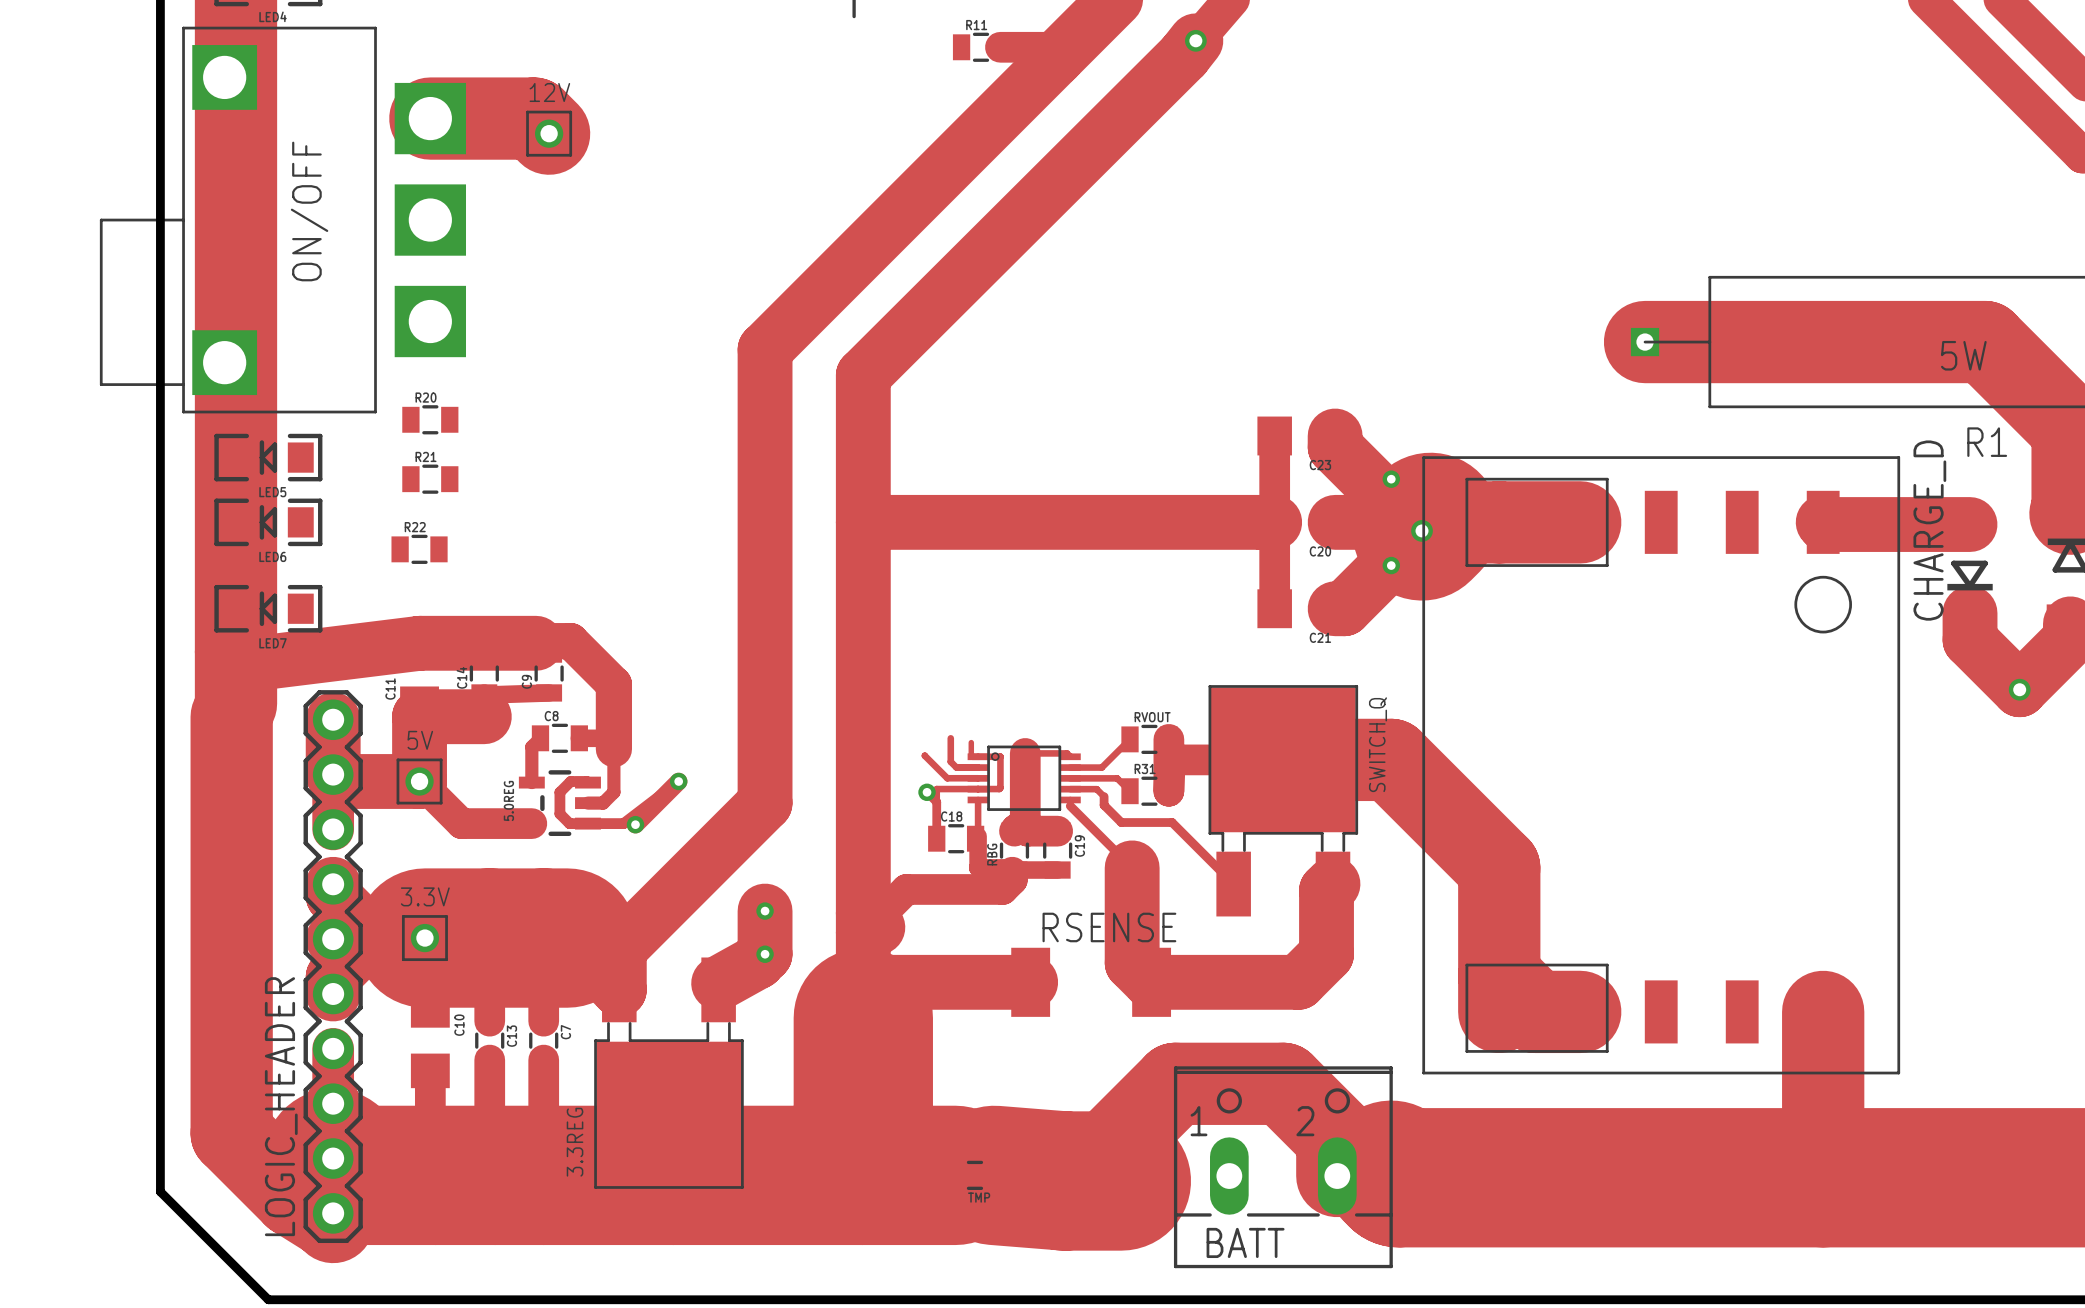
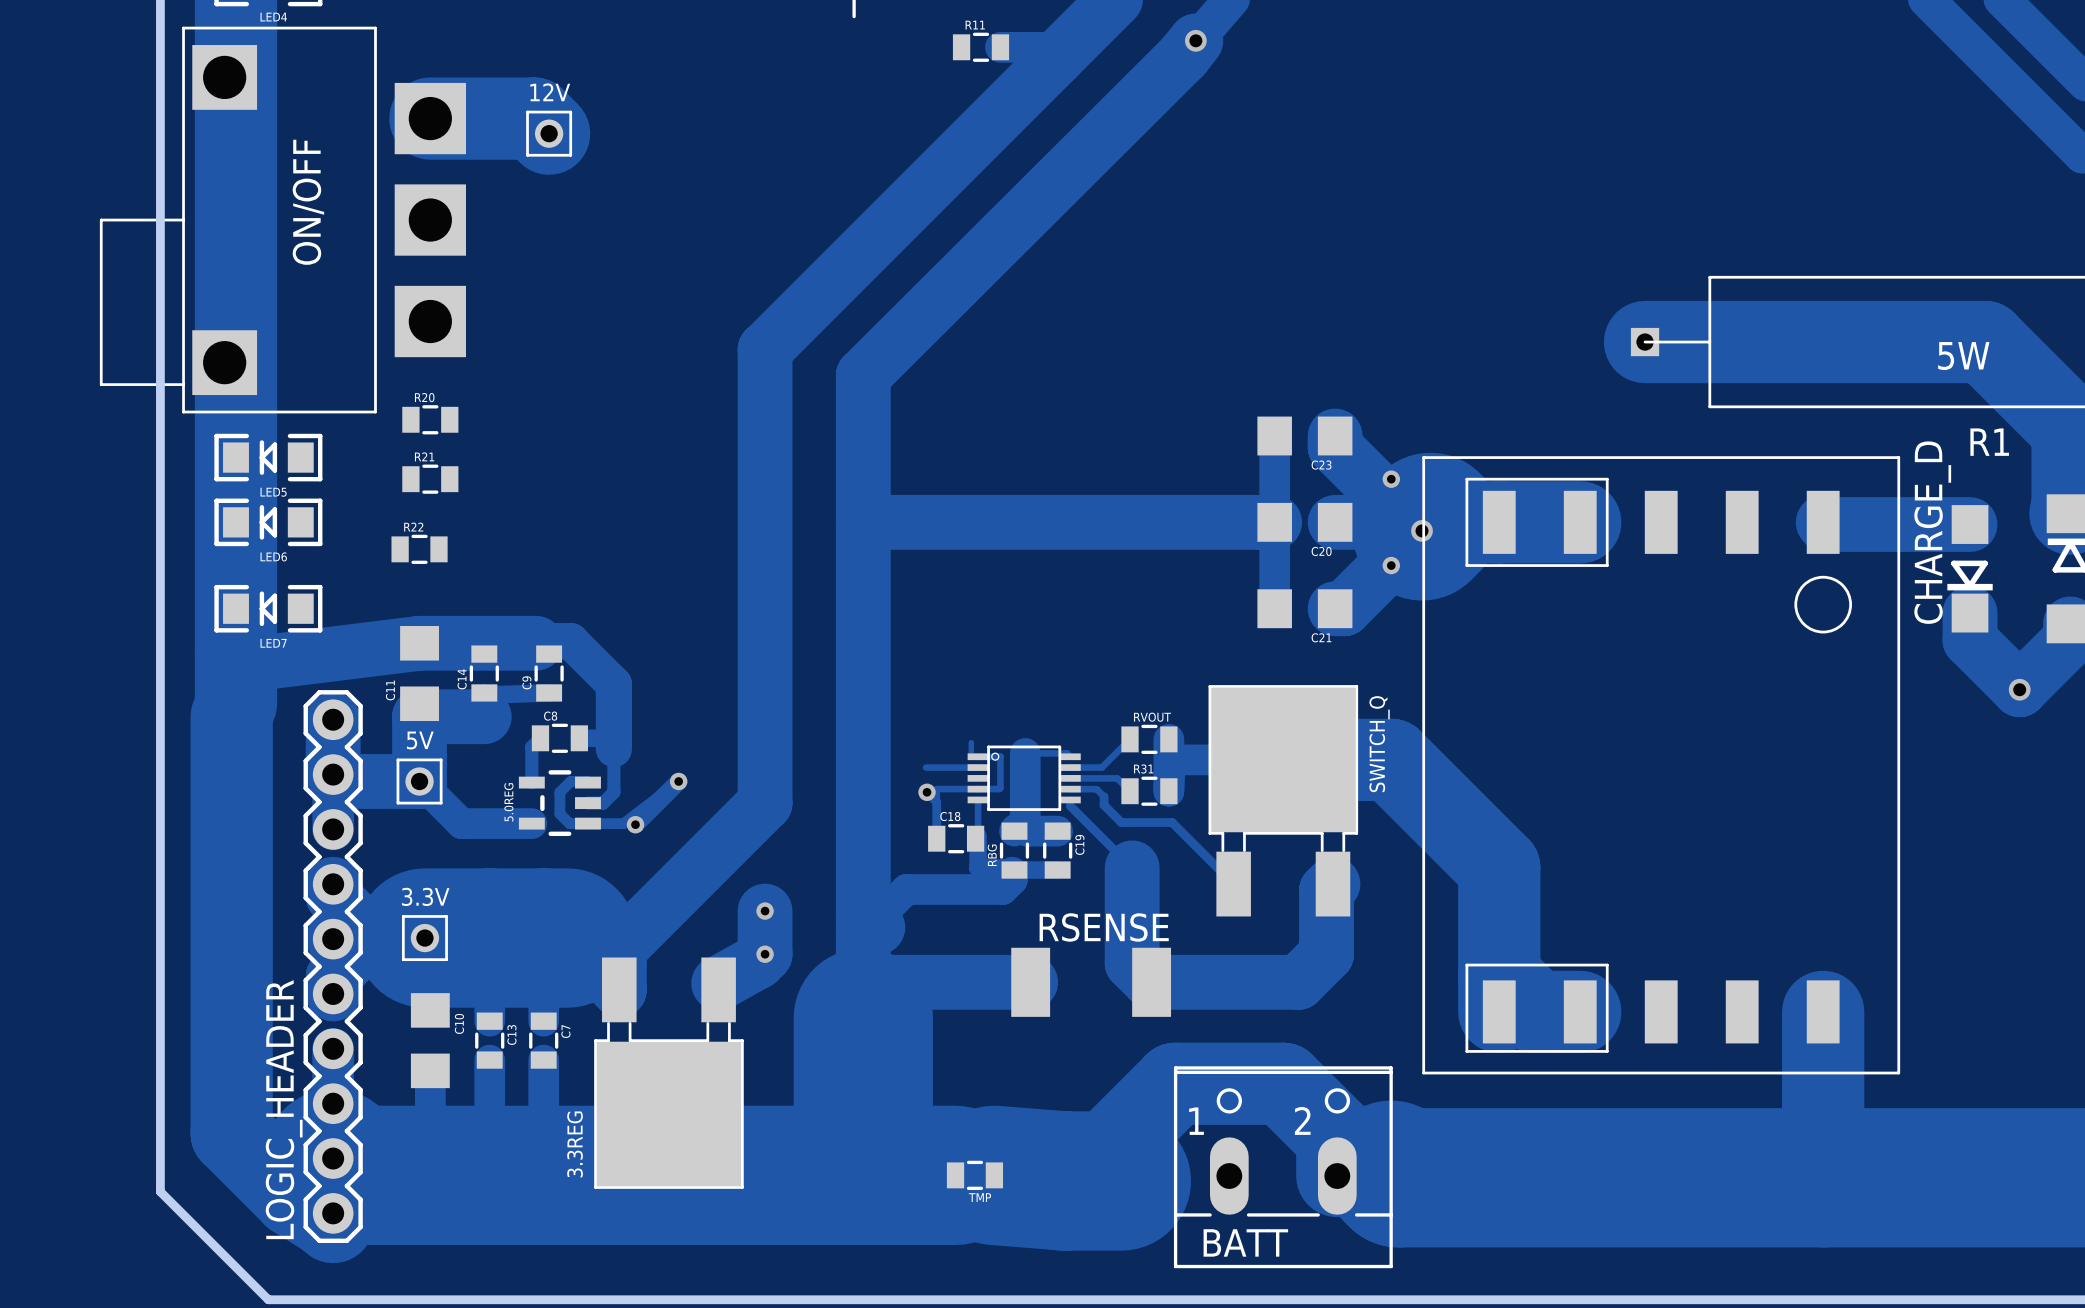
track: (950, 738) (950, 761) (956, 767) (977, 767) -> none
track: (924, 755) (947, 778) (977, 778) -> none
track: none -> (926, 767) (958, 767)

